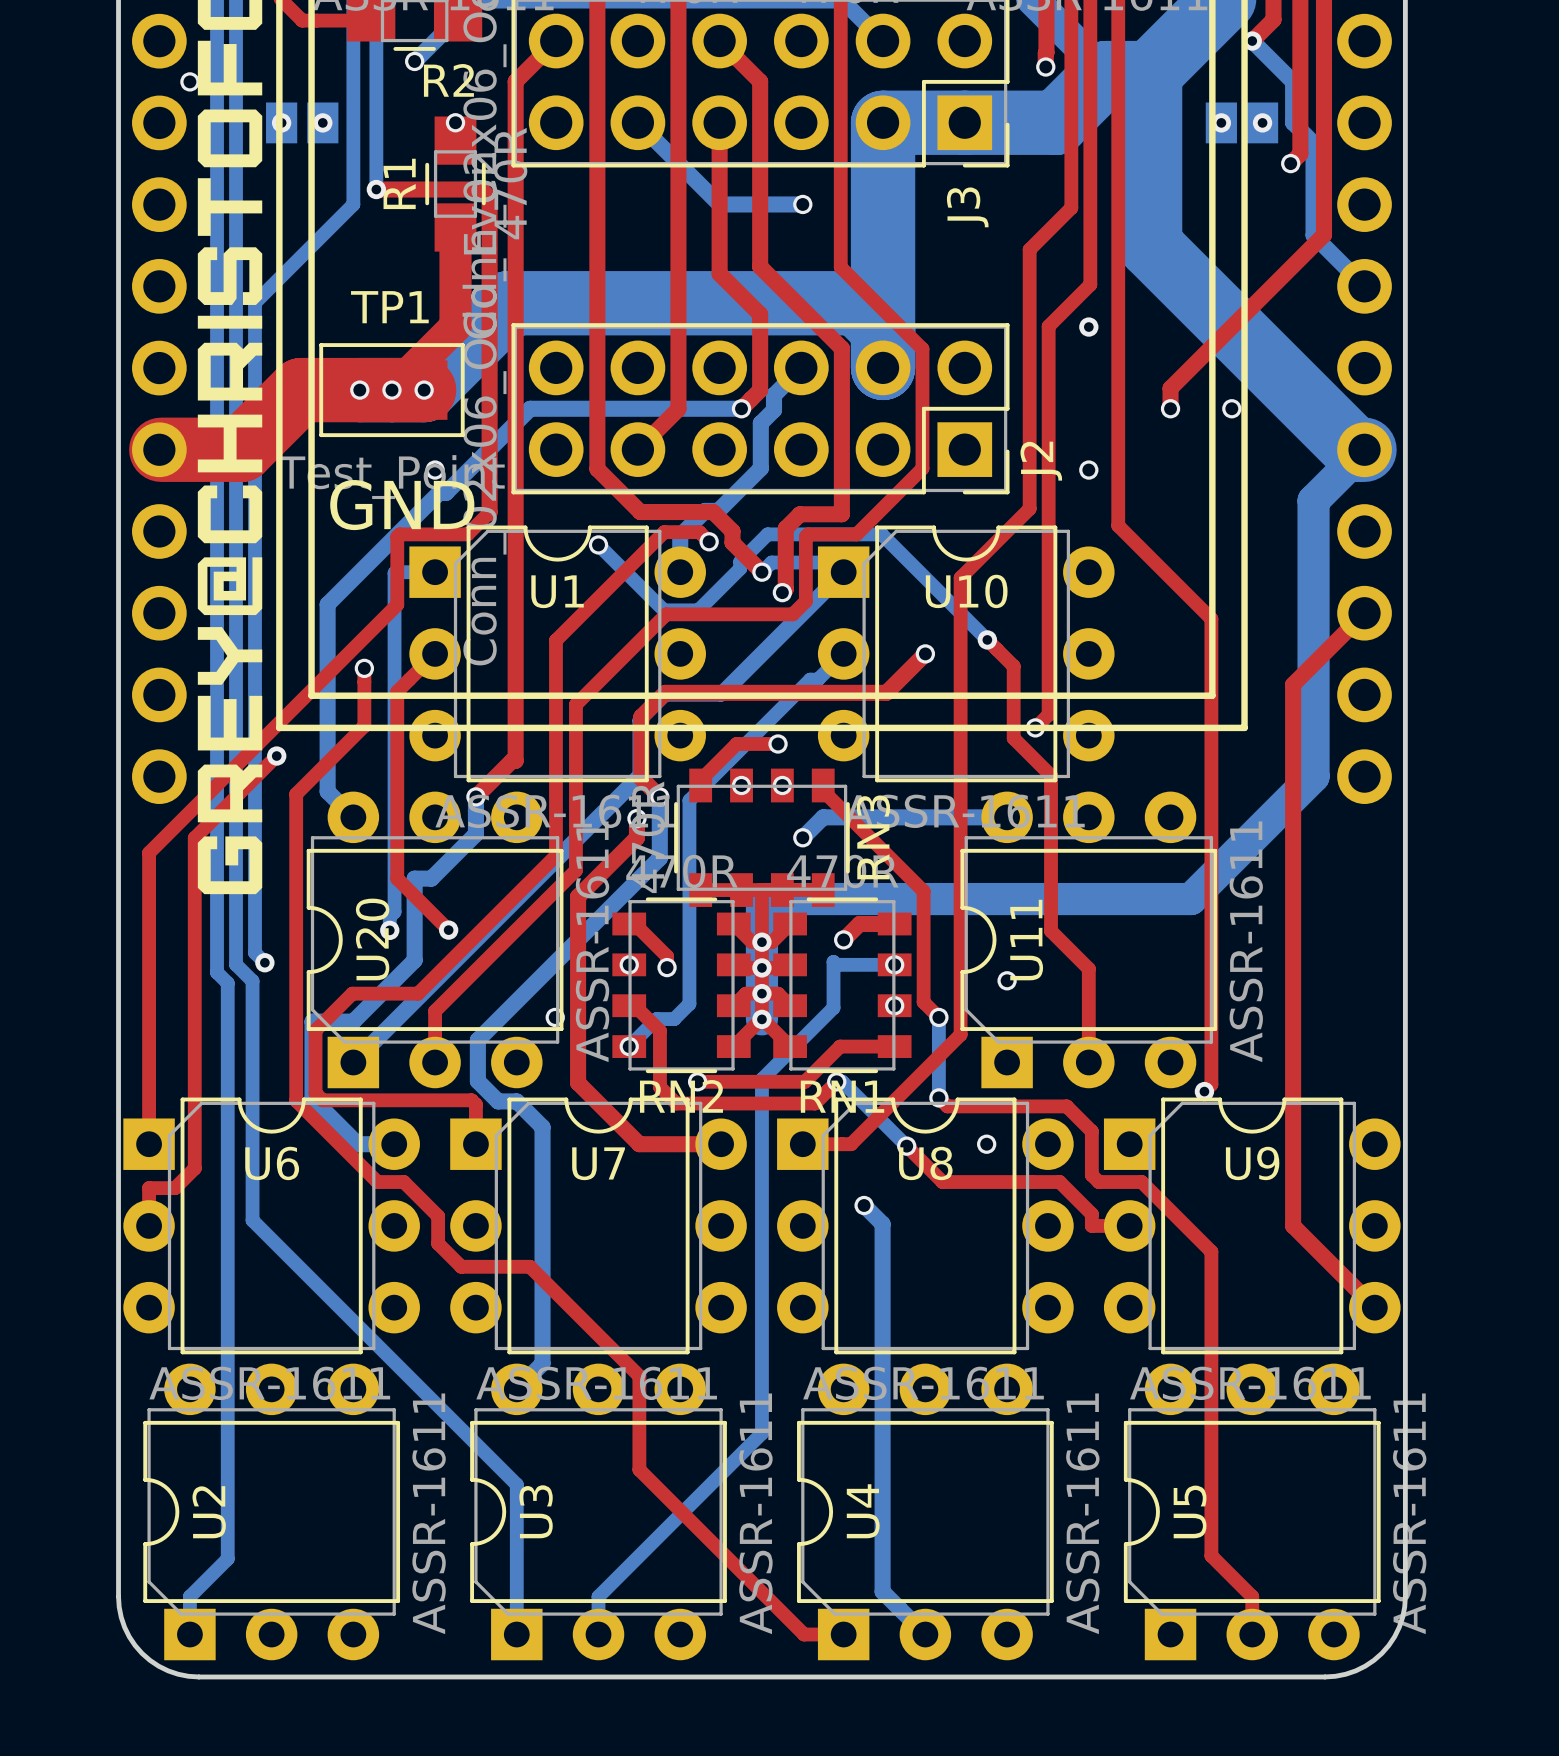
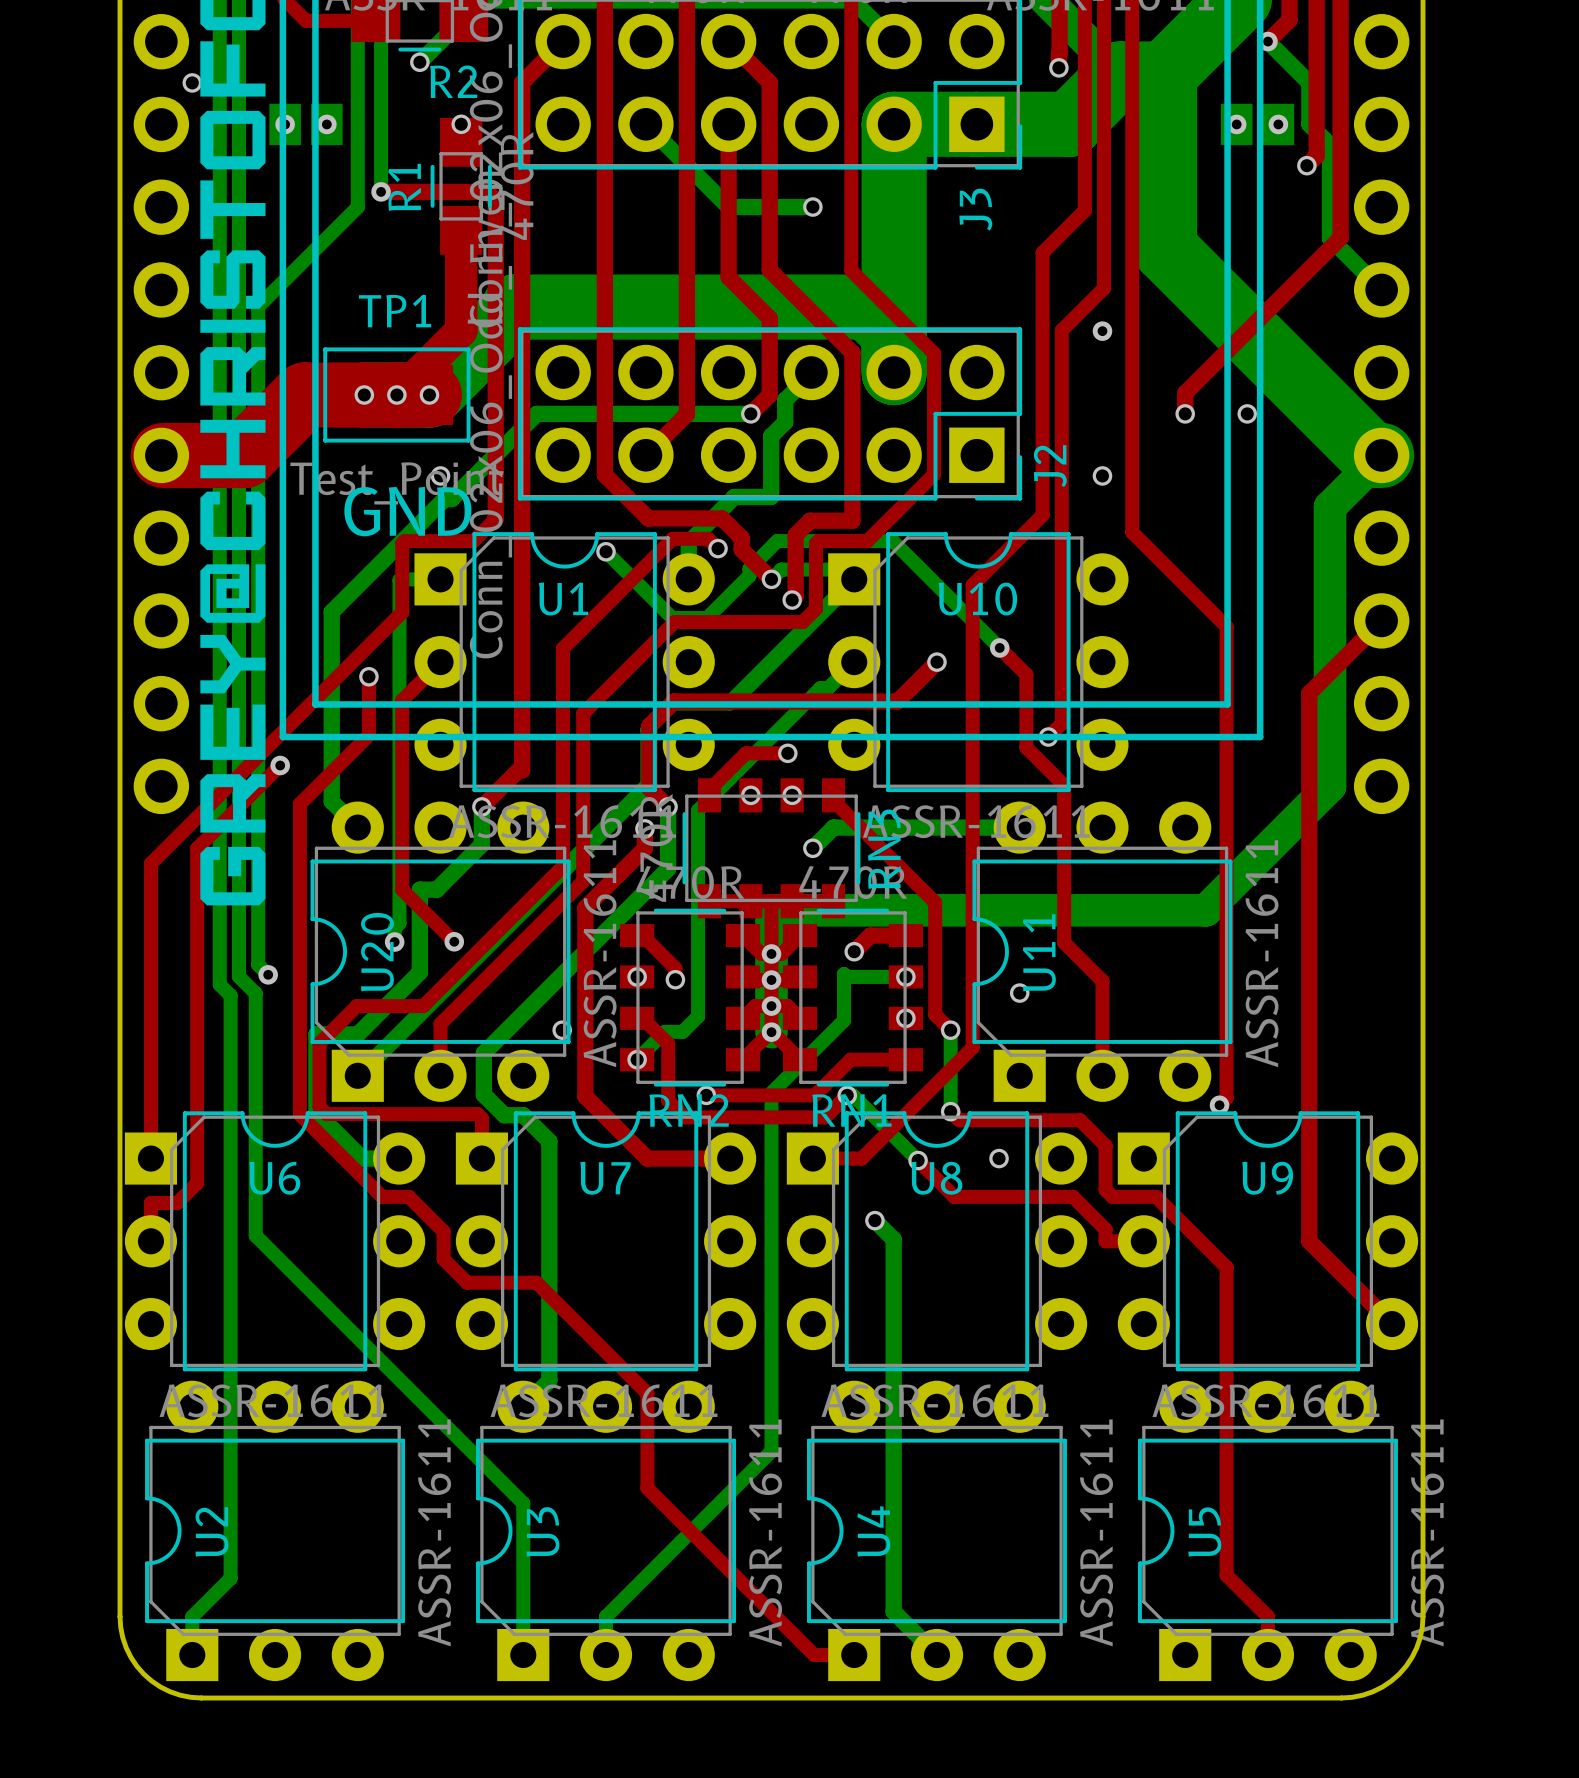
bottom track: (801, 367) (774, 395) (774, 410) (760, 423) (760, 468) (718, 510) (705, 510) -> (812, 372) (785, 400) (785, 422) (771, 436) (771, 496) (734, 496) (713, 517)

